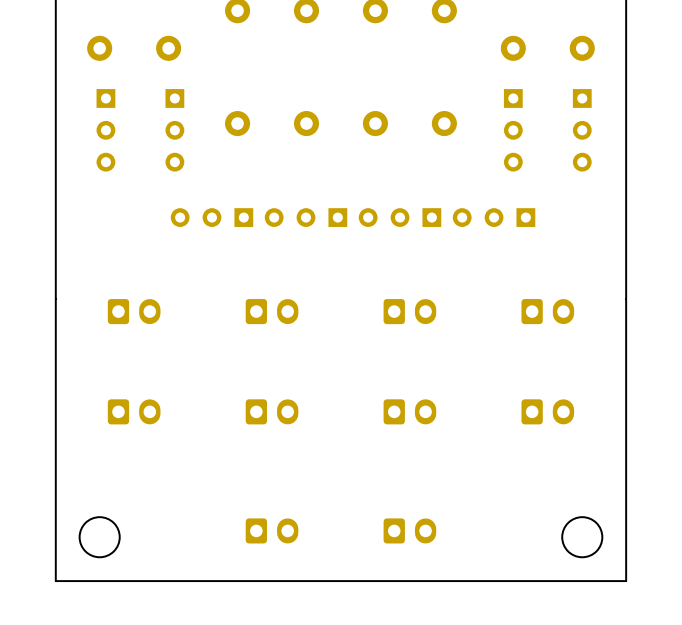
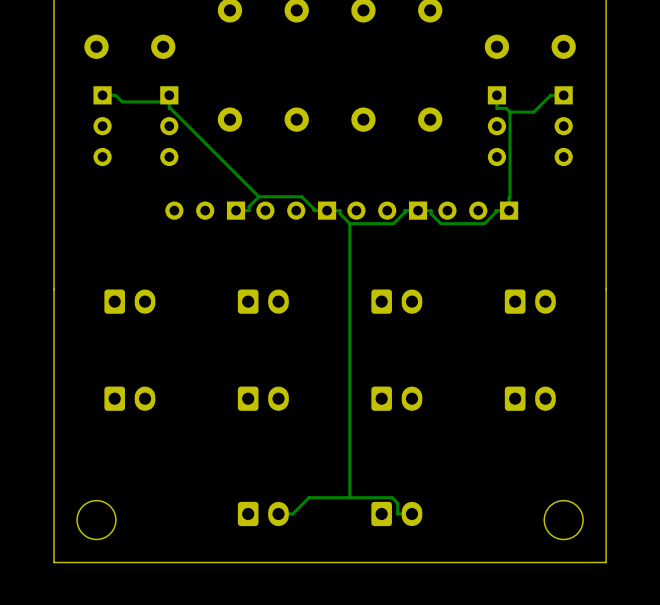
track: none -> (102, 95) (115, 95) (122, 101) (169, 101)
track: none -> (169, 95) (169, 108) (258, 196)
track: none -> (496, 95) (496, 108) (506, 108) (509, 112)
track: none -> (563, 95) (550, 95) (533, 112) (509, 112)
track: none -> (509, 112) (509, 210) (496, 210) (484, 223) (440, 223) (431, 213) (431, 210) (405, 210) (393, 223) (349, 223)
track: none -> (258, 196) (301, 196) (314, 210) (340, 210) (340, 213) (349, 223)
track: none -> (258, 196) (249, 206) (249, 210) (236, 210)
track: none -> (349, 223) (349, 497)
track: none -> (411, 513) (397, 513) (397, 503) (392, 497) (309, 497) (292, 513) (278, 513)

